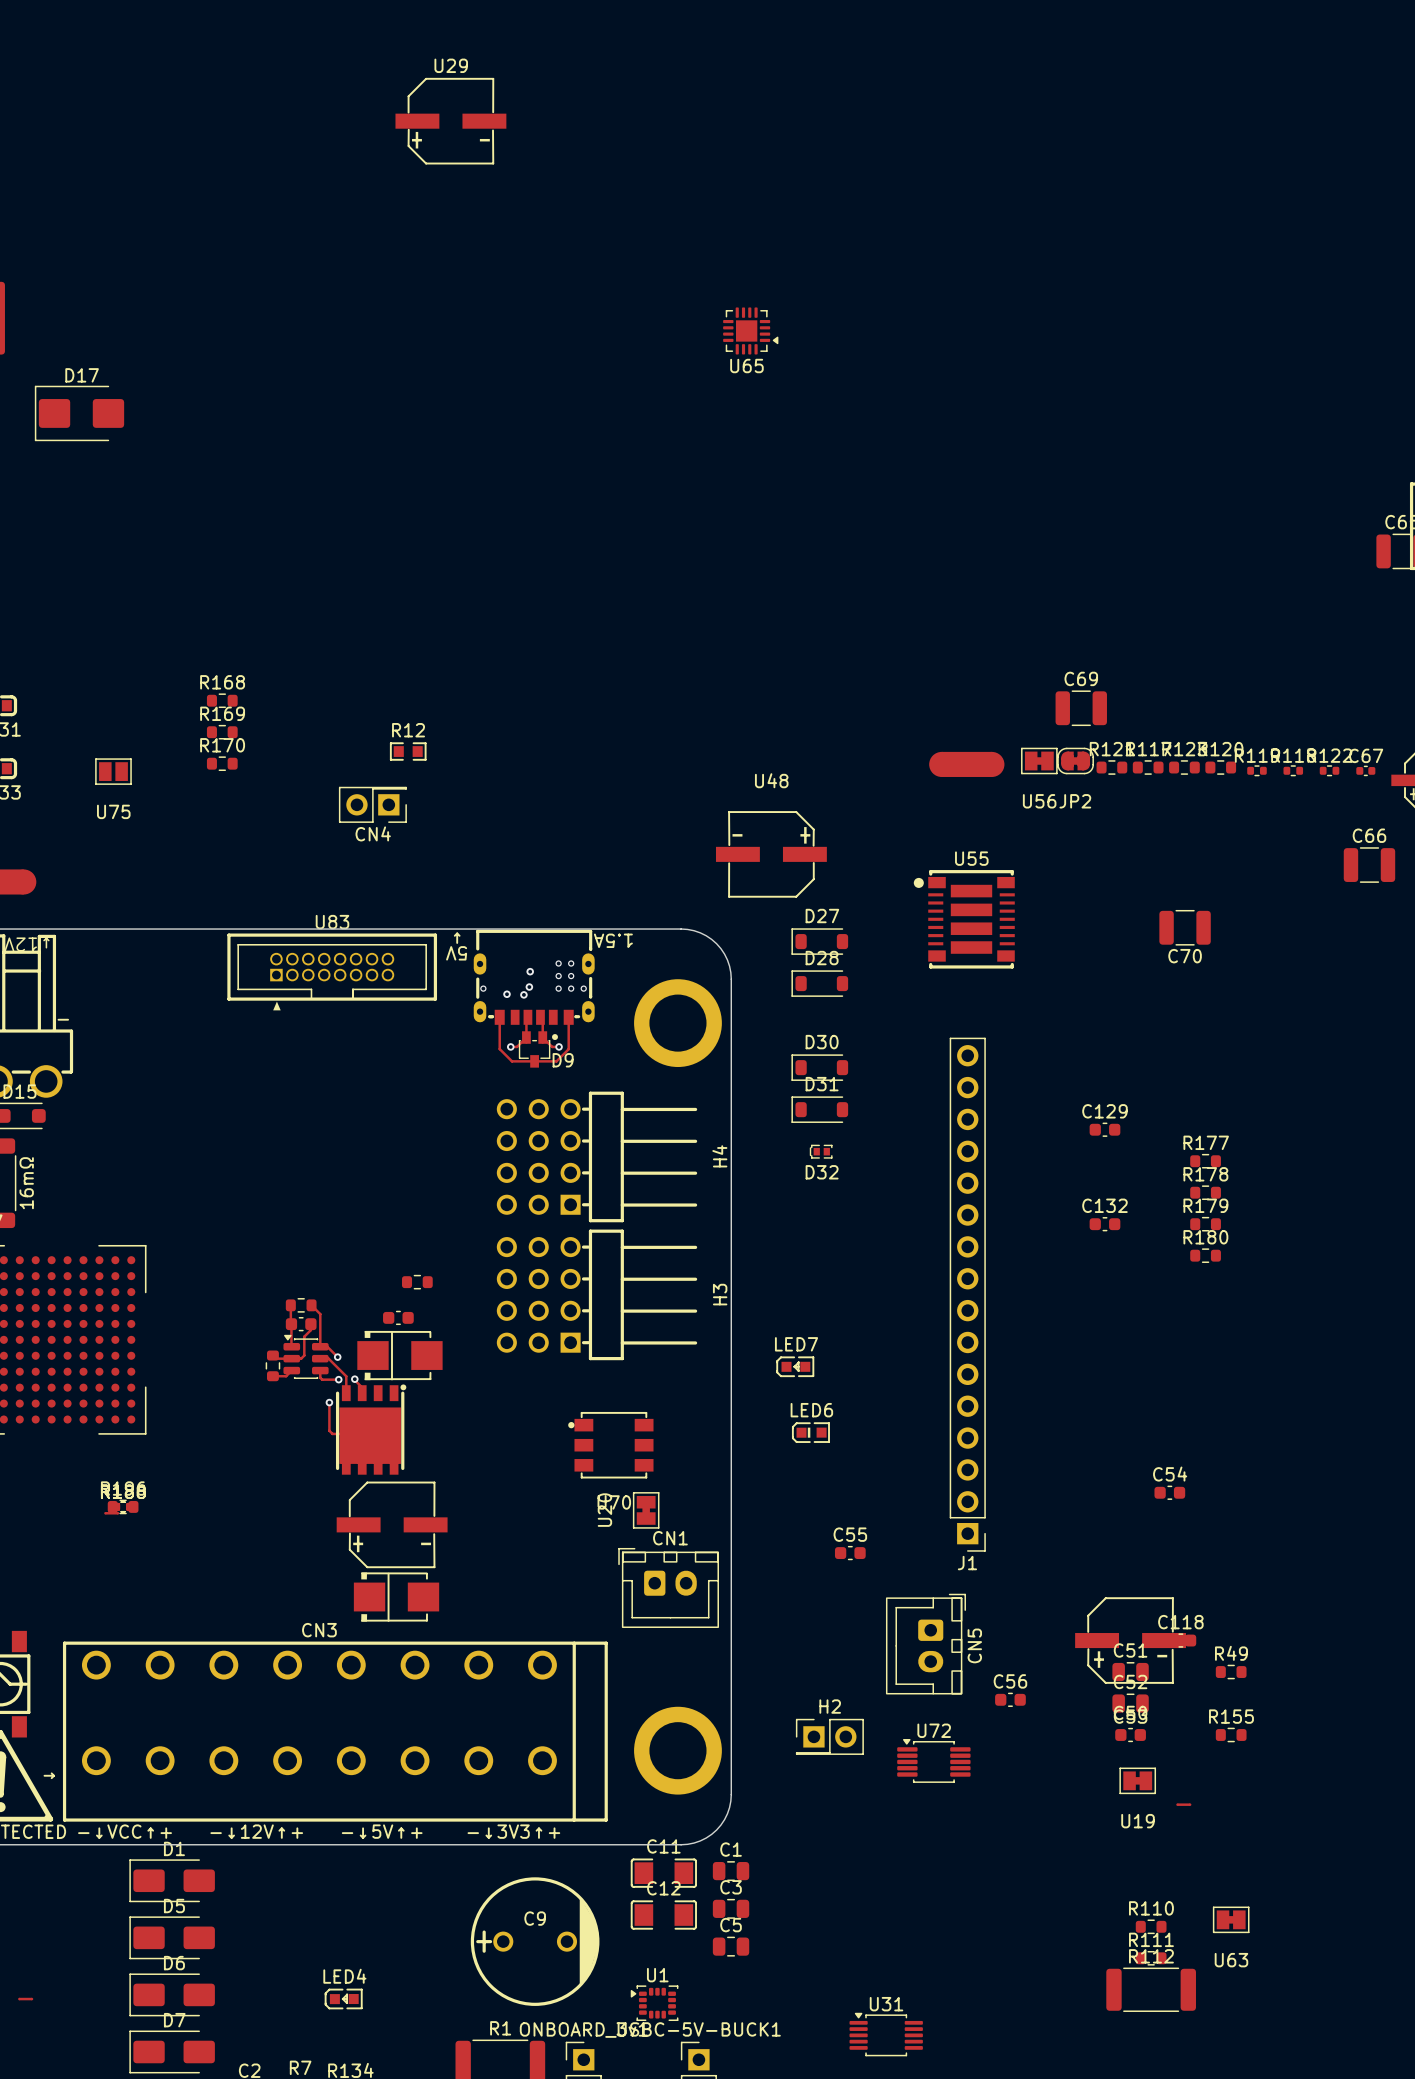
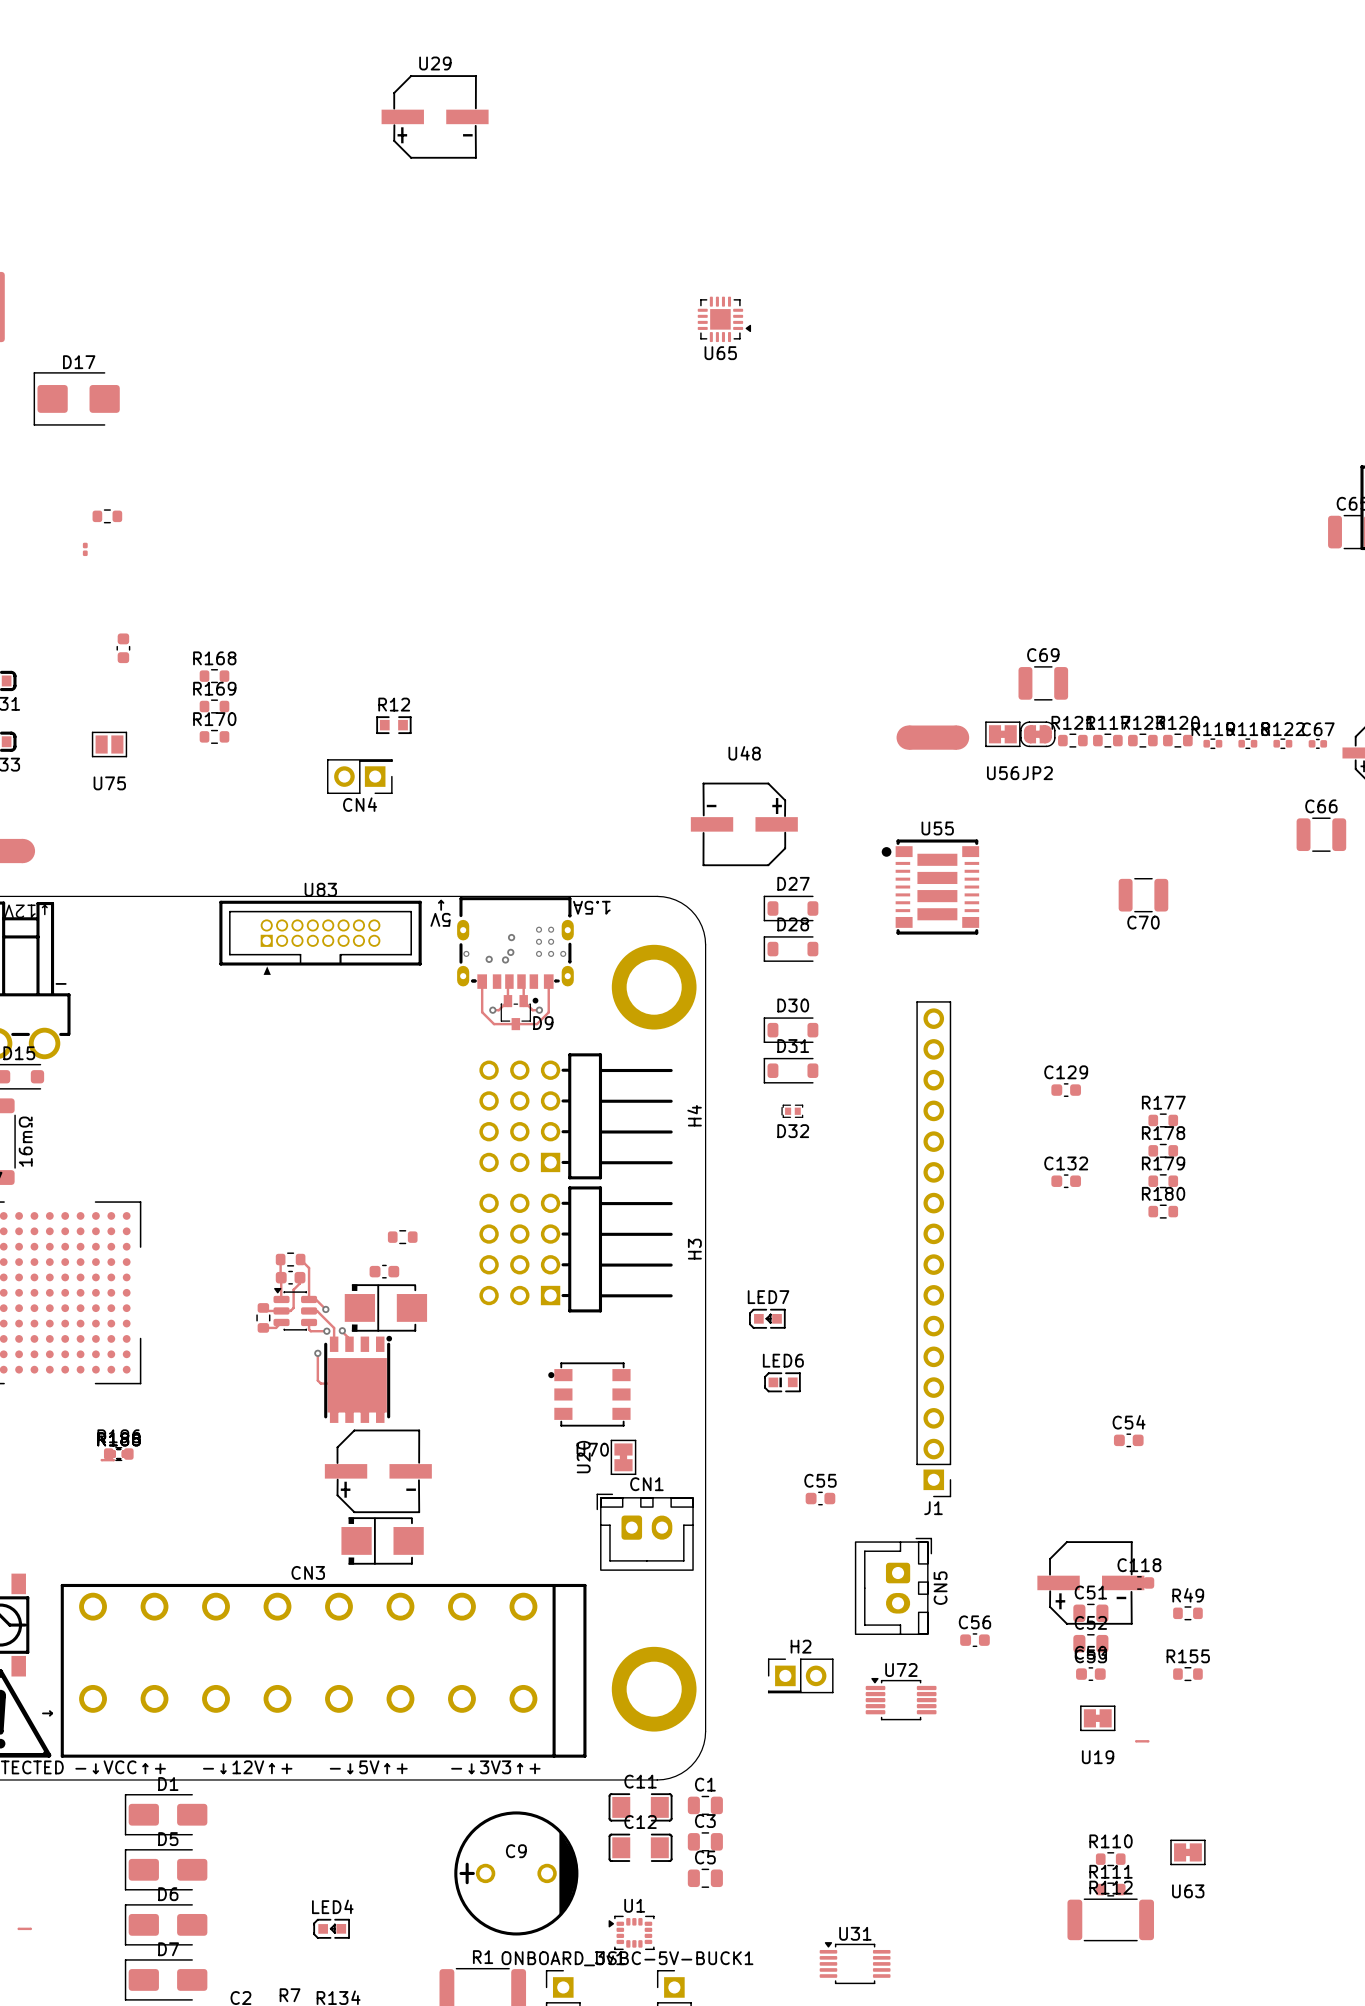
part: none -> (107, 516)
part: none -> (85, 549)
part: none -> (123, 648)

